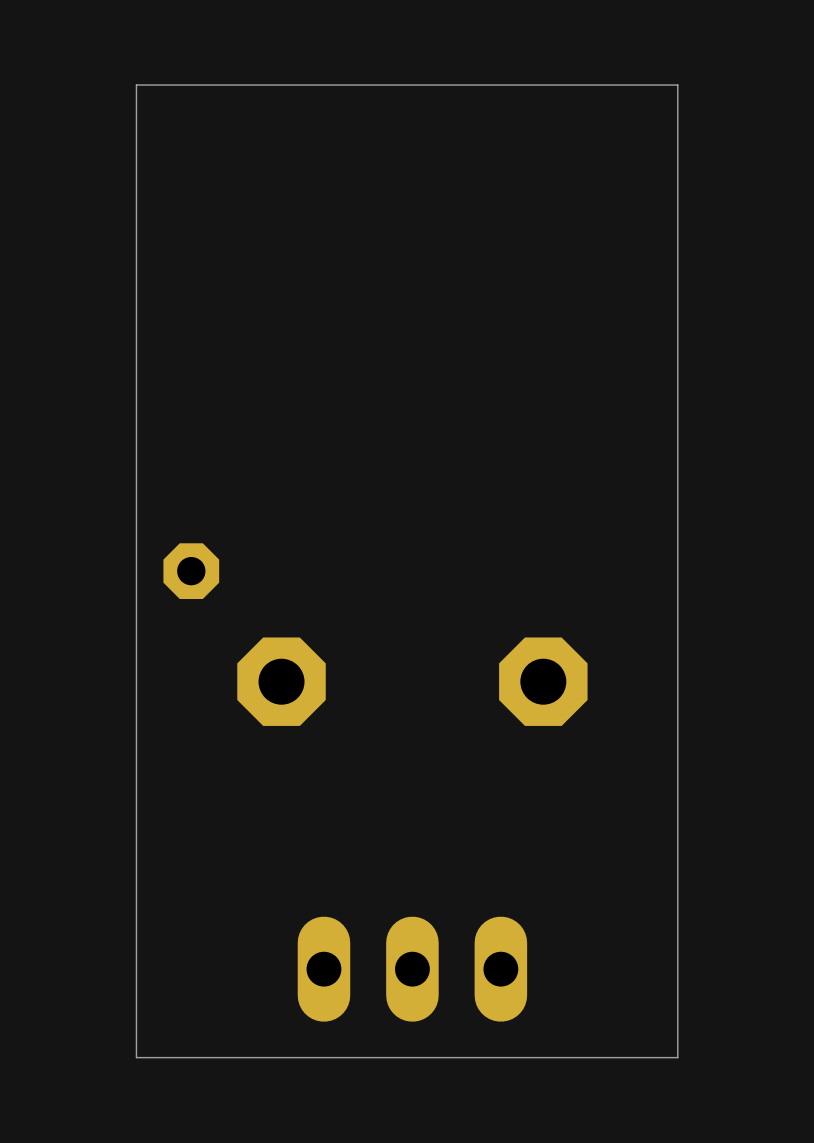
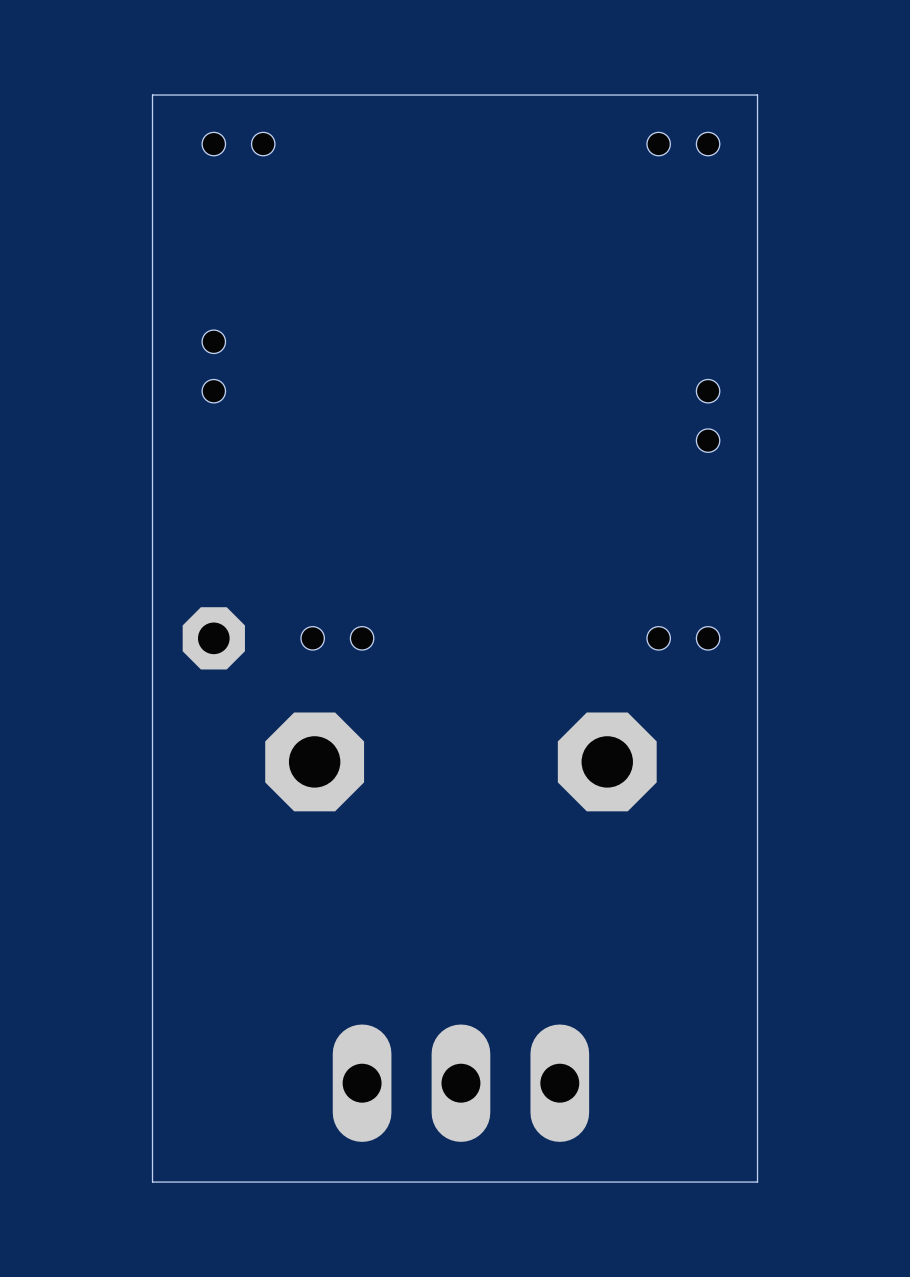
hole: none -> (213, 144)
hole: none -> (263, 144)
hole: none -> (658, 144)
hole: none -> (708, 144)
hole: none -> (213, 341)
hole: none -> (213, 391)
hole: none -> (708, 391)
hole: none -> (708, 440)
hole: none -> (312, 638)
hole: none -> (362, 638)
hole: none -> (658, 638)
hole: none -> (708, 638)

